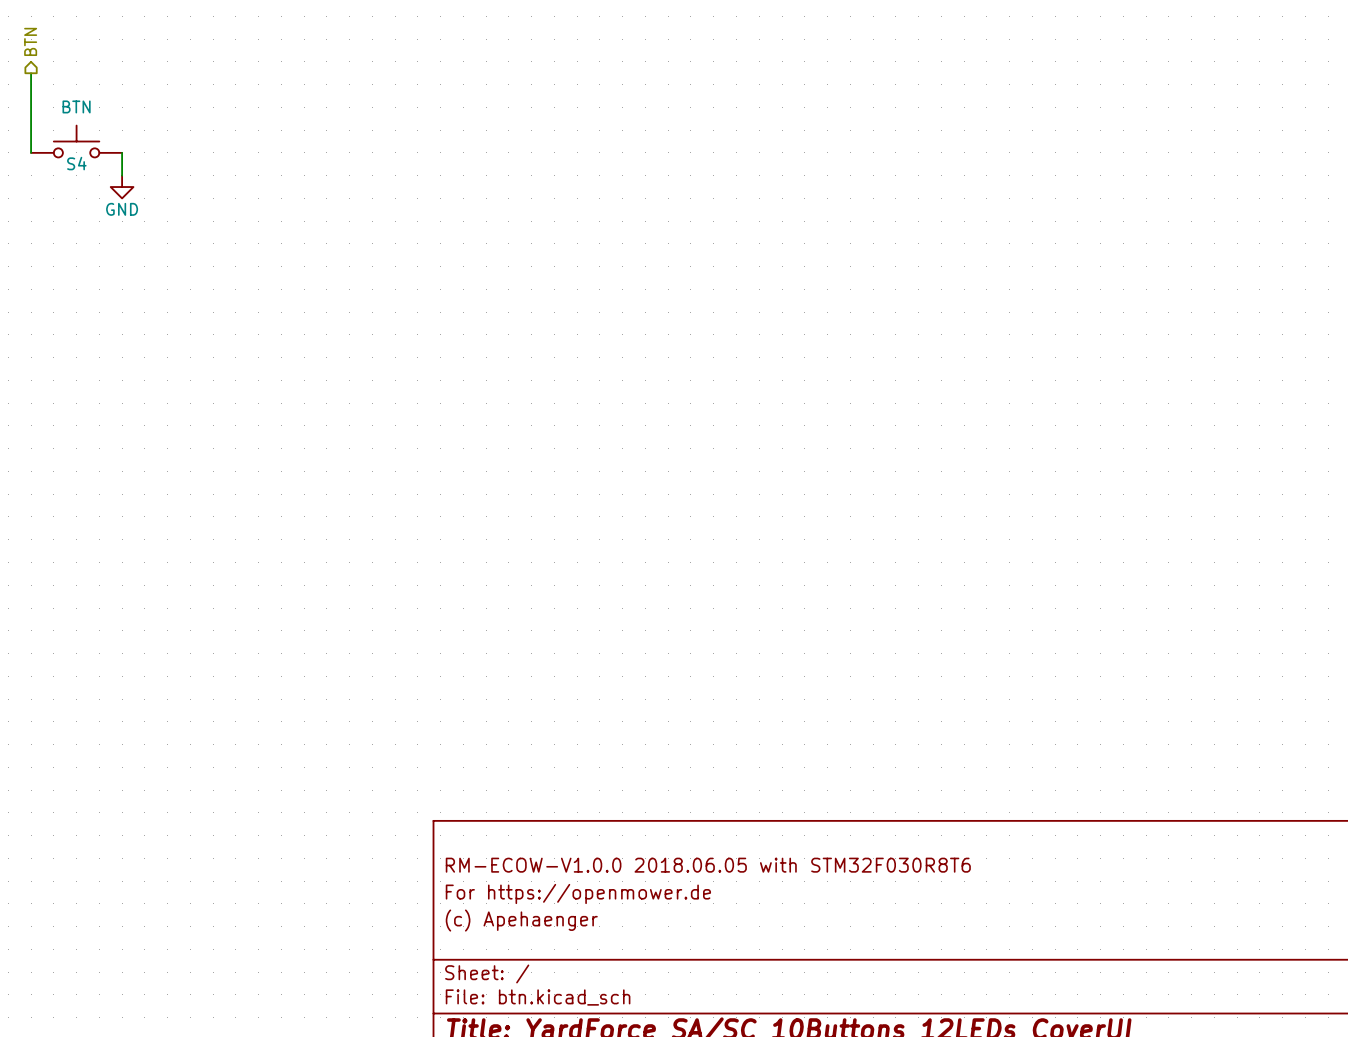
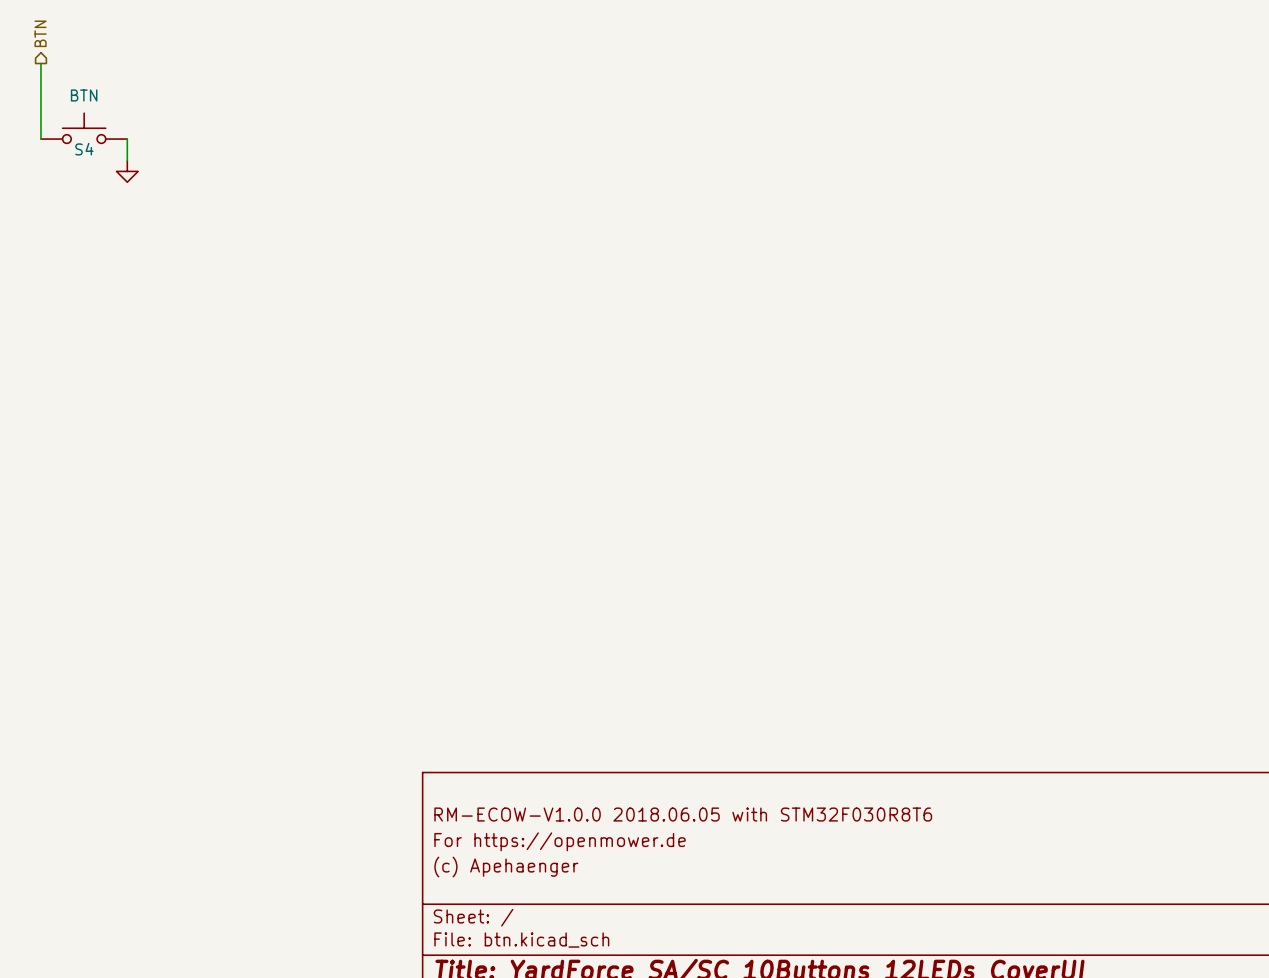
power symbol text: GND (122, 209) -> none

